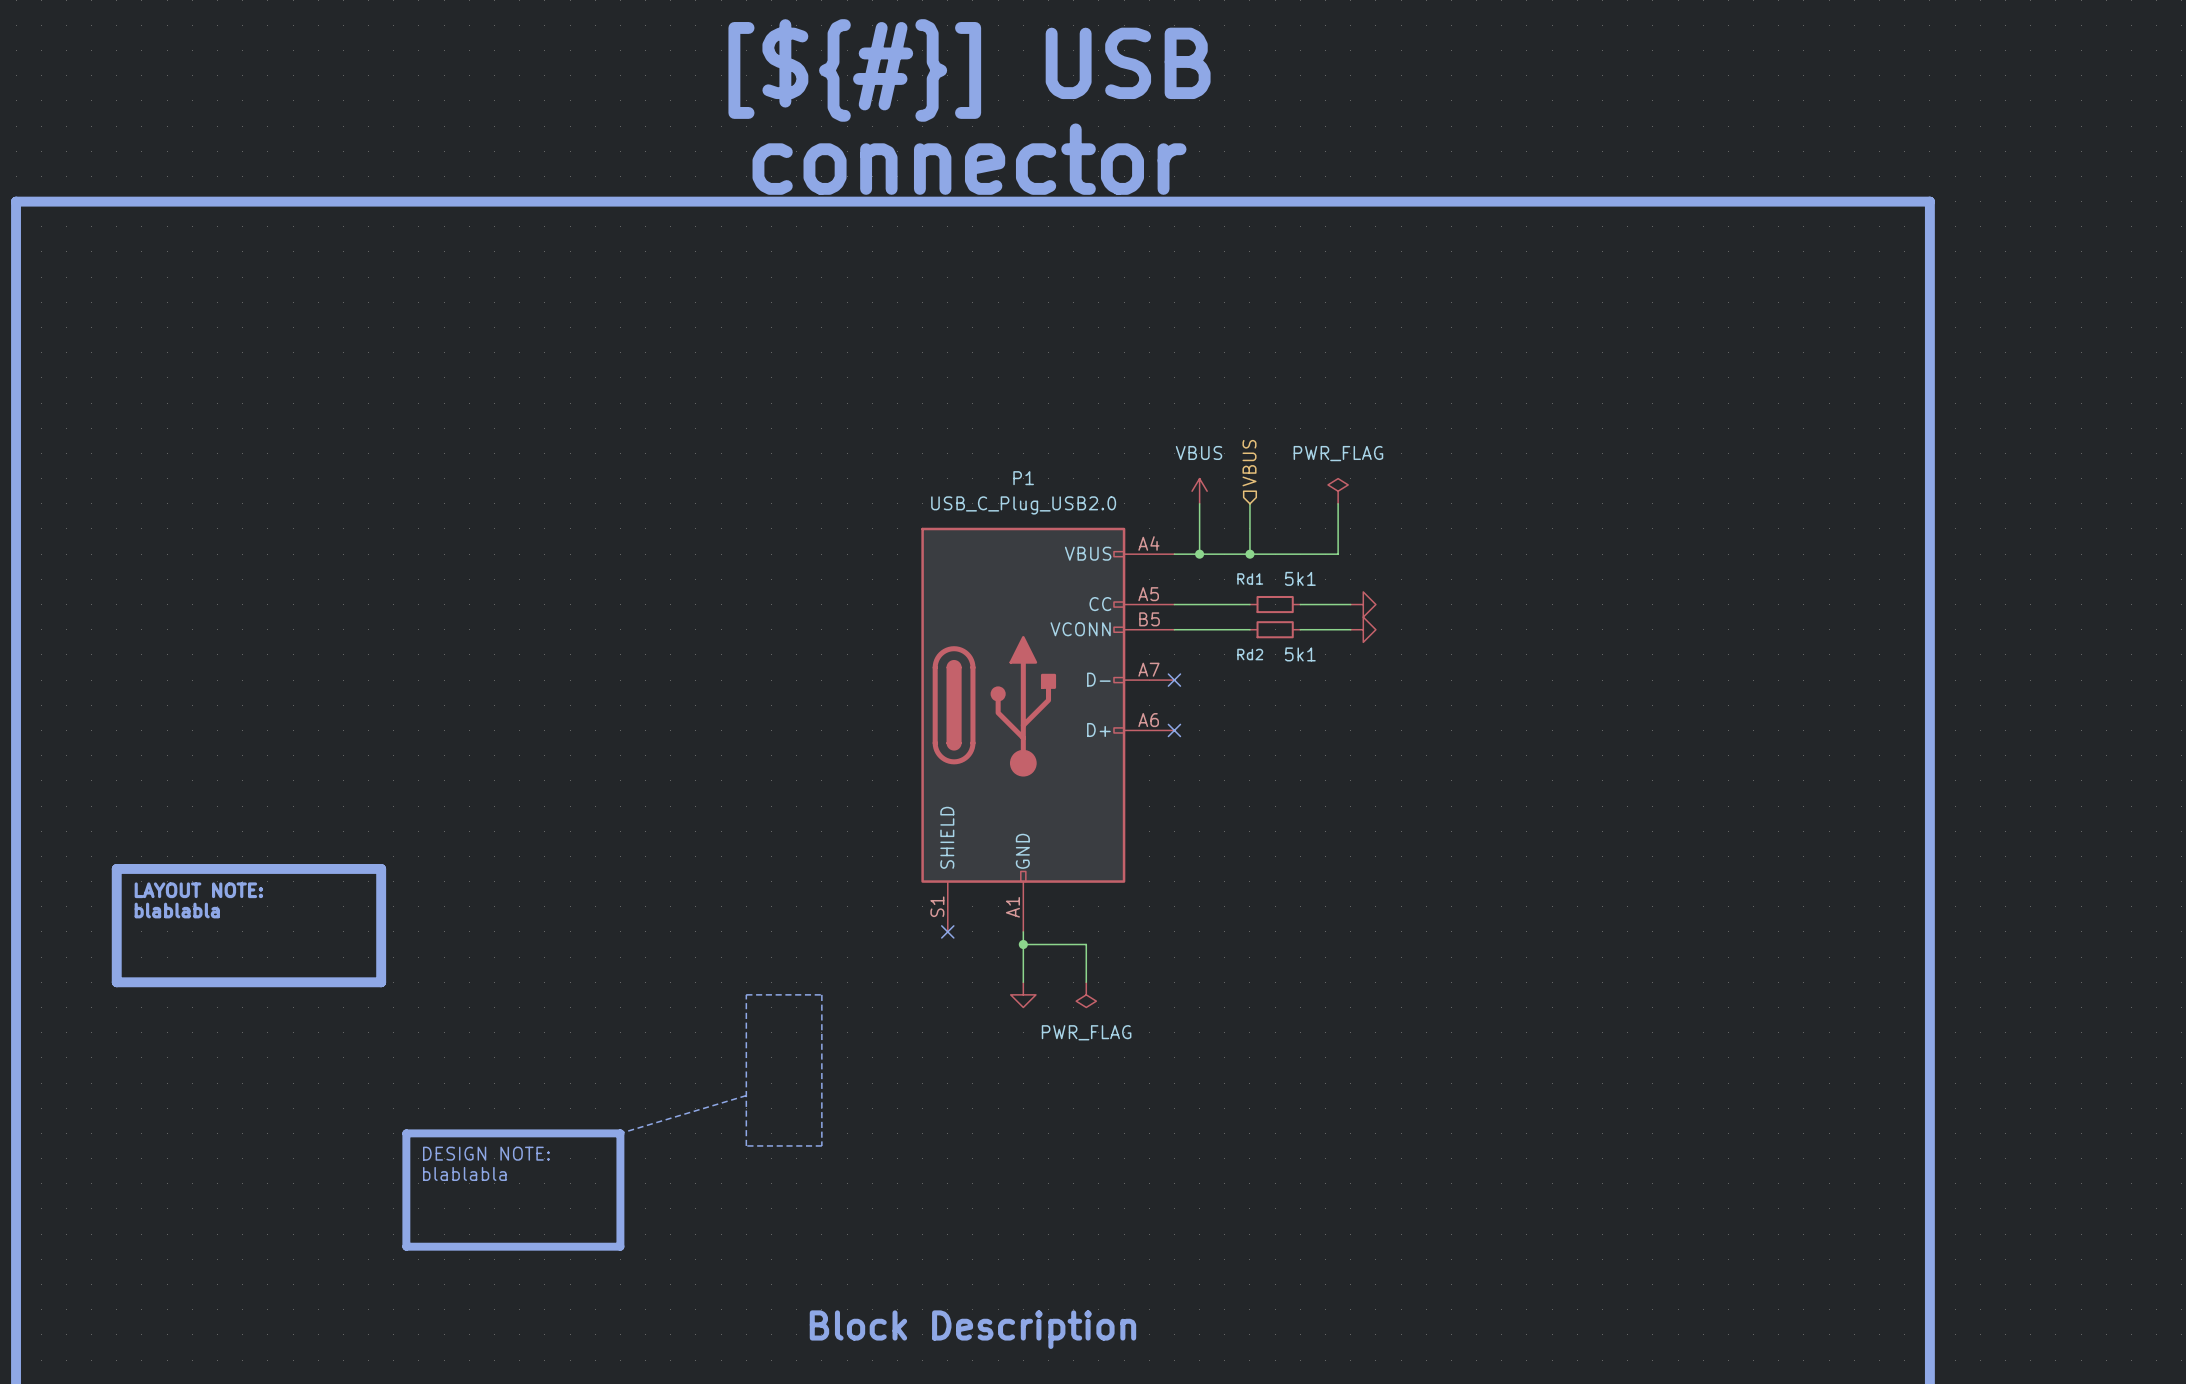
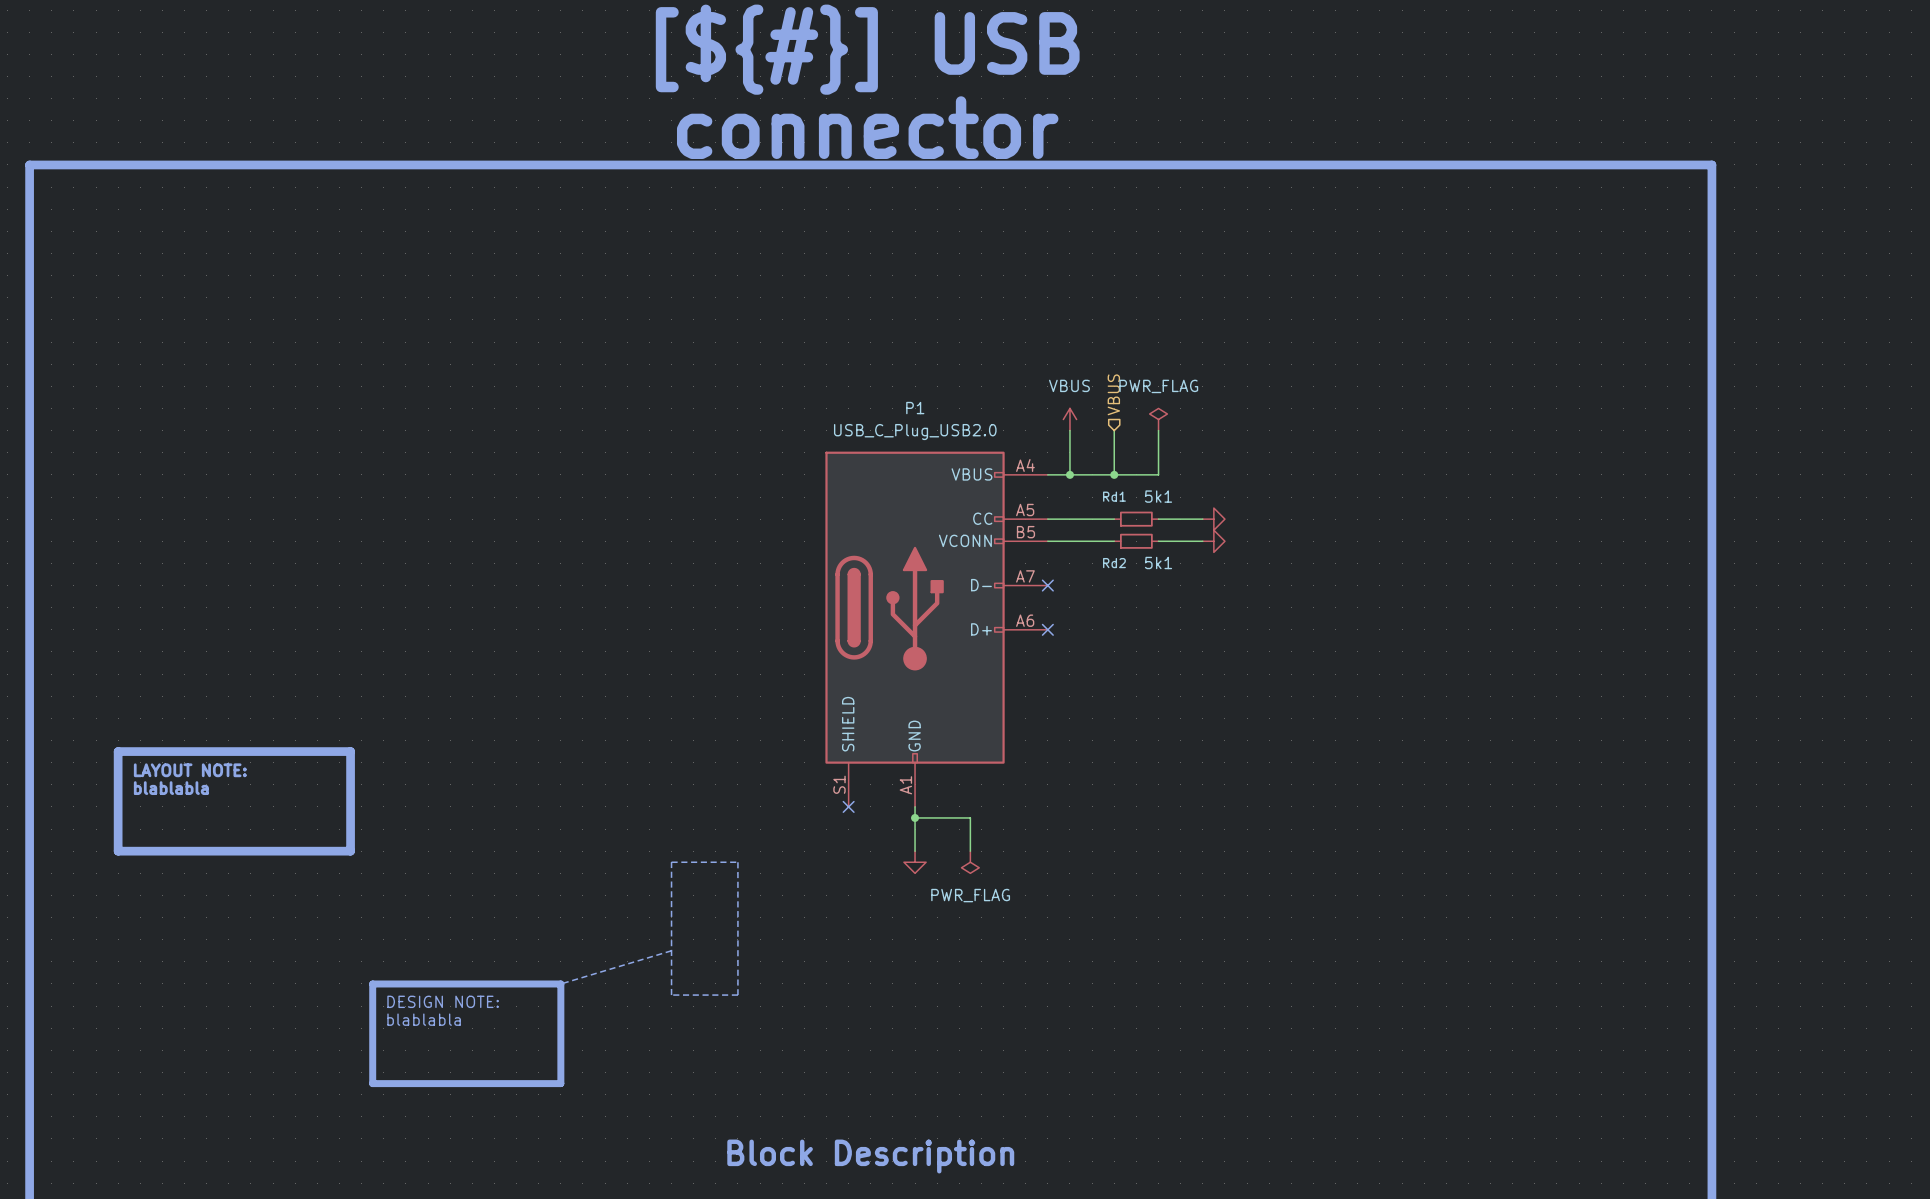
power symbol position: PWR_FLAG (1338, 491) -> PWR_FLAG (1158, 419)
wire: (1338, 503) (1338, 554) (1300, 554) -> (1158, 430) (1158, 474)

